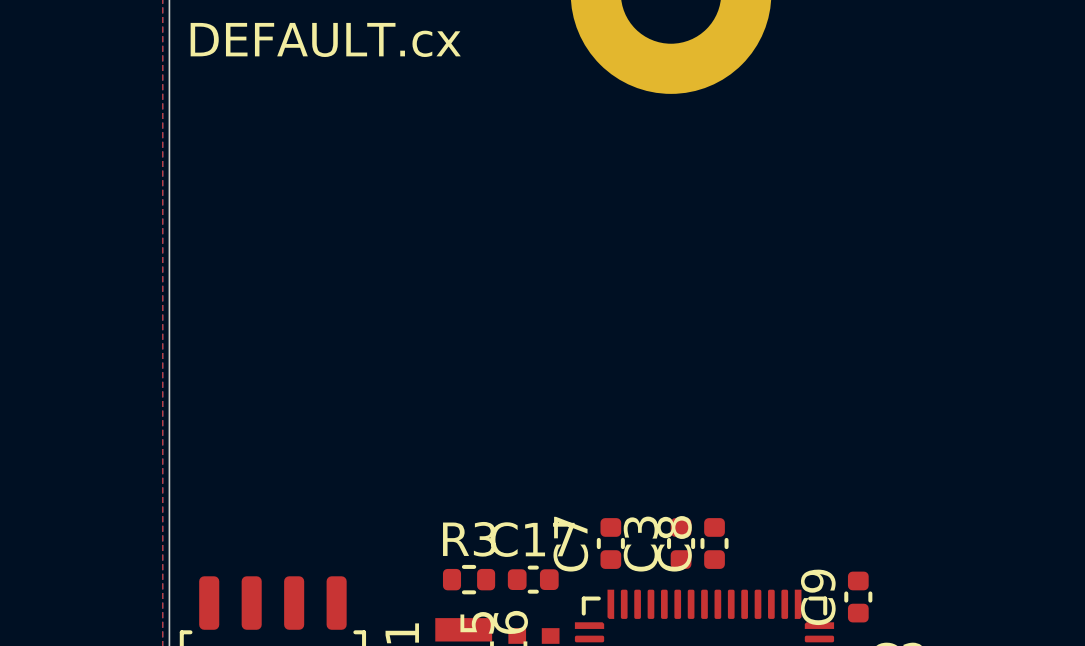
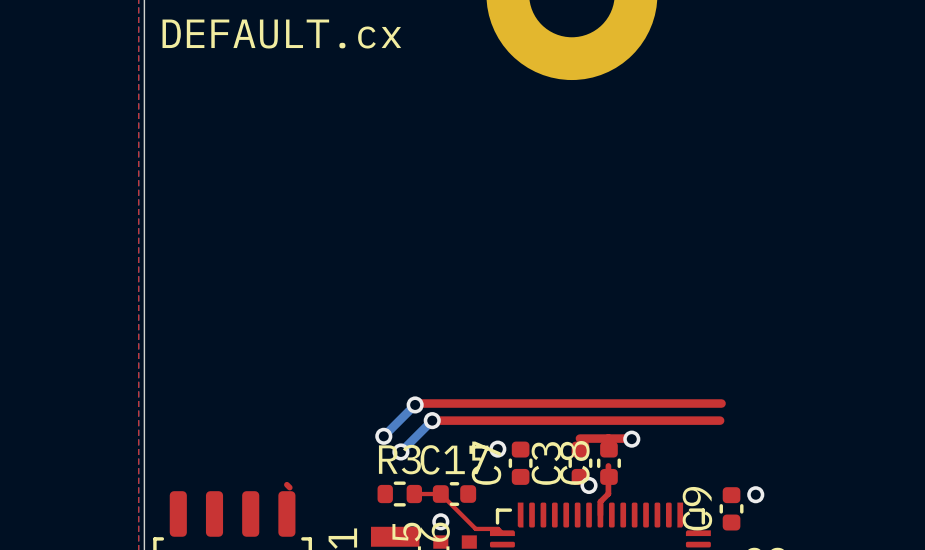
top track: none -> (721, 403) (415, 404)
bottom track: none -> (415, 404) (383, 436)
via: none -> (415, 404)
top track: none -> (432, 420) (720, 420)
bottom track: none -> (432, 420) (400, 451)
via: none -> (432, 420)
via: none -> (383, 436)
top track: none -> (579, 438) (631, 439)
via: none -> (631, 439)
via: none -> (497, 449)
via: none -> (400, 451)
top track: none -> (608, 465) (608, 493) (600, 501) (600, 515)
top track: none -> (286, 484) (289, 487)
via: none -> (589, 485)
top track: none -> (414, 494) (440, 494) (475, 528) (498, 528) (502, 533)
via: none -> (755, 494)
via: none -> (440, 521)

